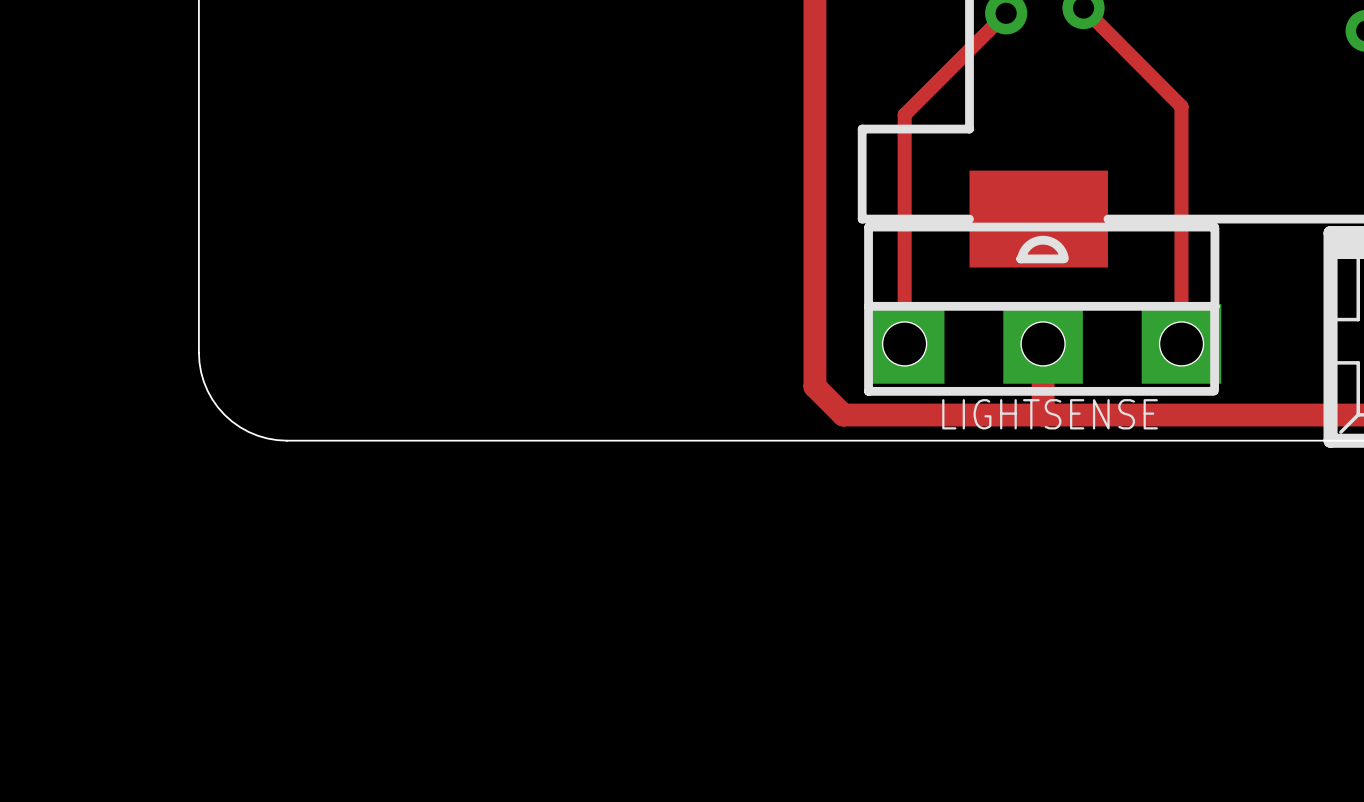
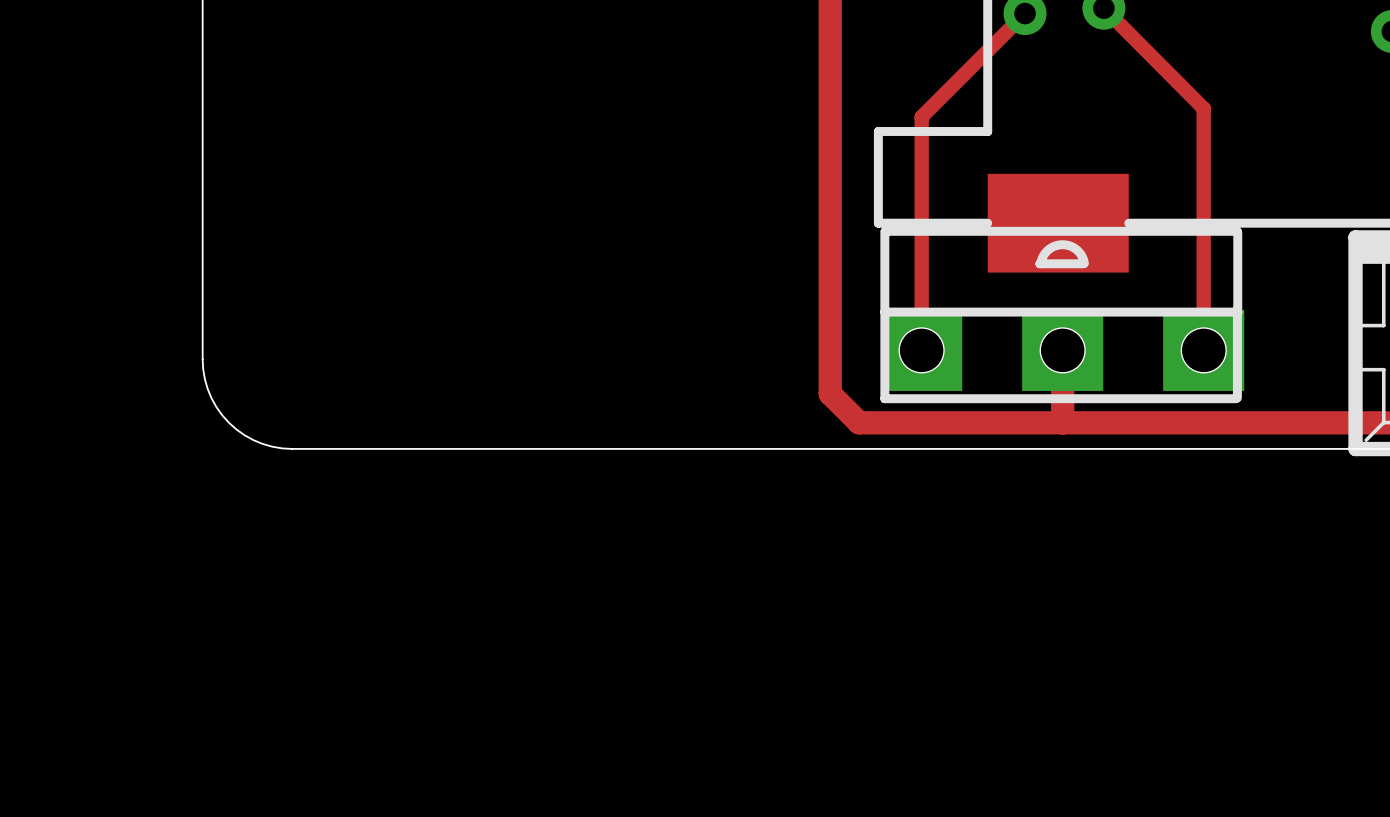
text: LIGHTSENSE (1050, 414) -> none

